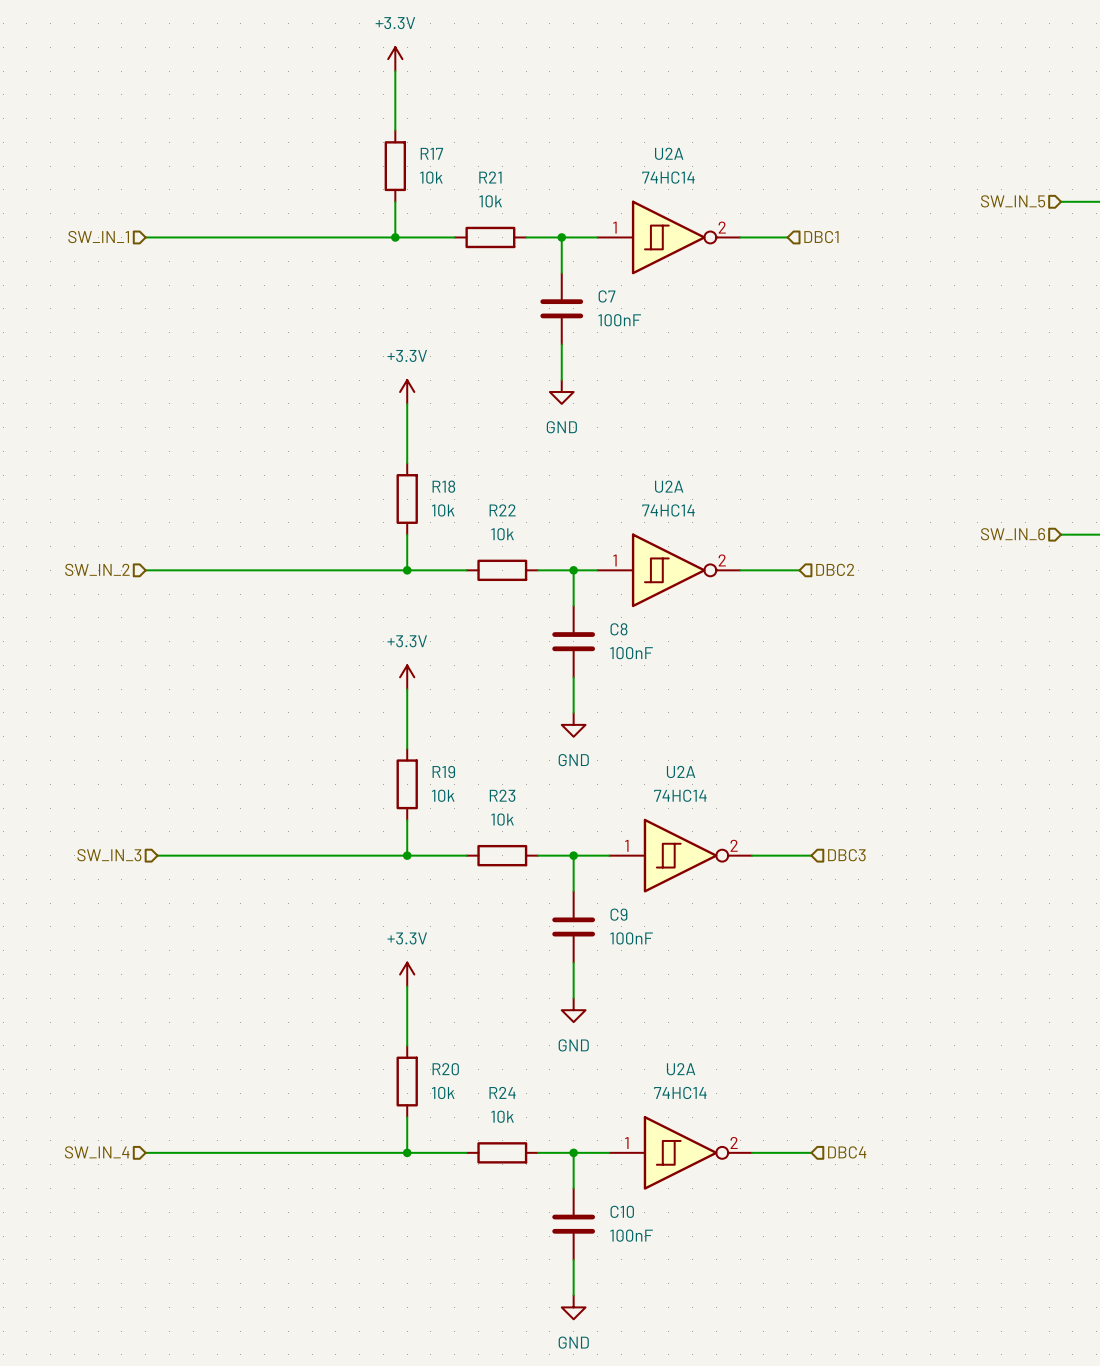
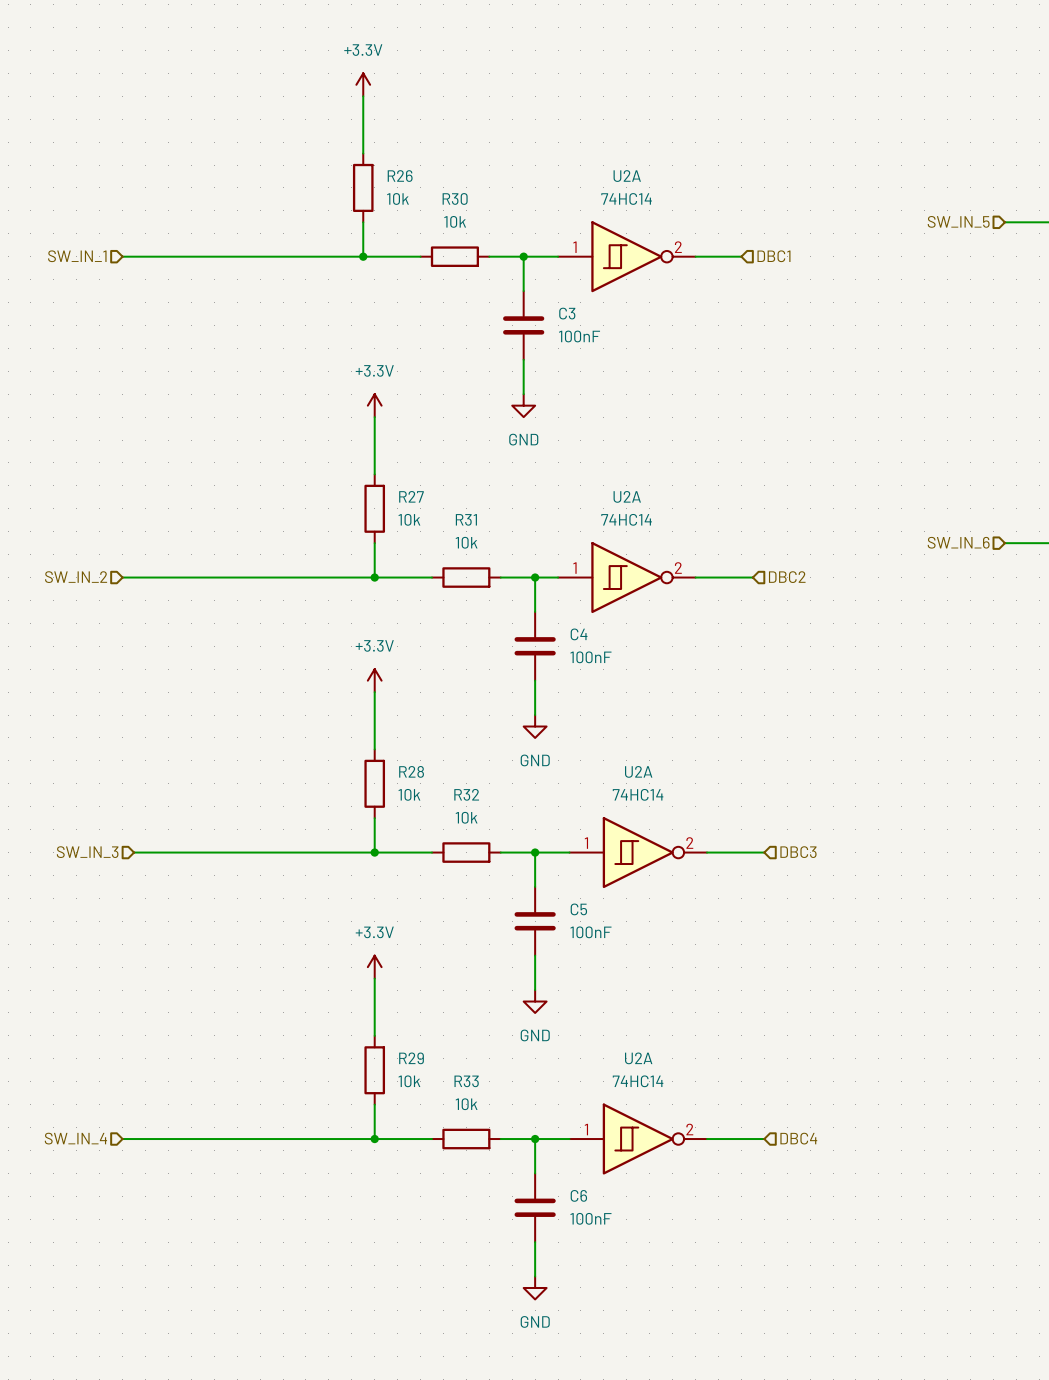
R17 name: R17 (431, 153) -> R26 (400, 176)
R21 name: R21 (490, 177) -> R30 (455, 198)
C7 name: C7 (607, 296) -> C3 (567, 313)
R18 name: R18 (443, 486) -> R27 (411, 496)
R22 name: R22 (502, 510) -> R31 (466, 519)
C8 name: C8 (618, 629) -> C4 (579, 634)
R19 name: R19 (443, 771) -> R28 (411, 771)
R23 name: R23 (502, 795) -> R32 (466, 794)
C9 name: C9 (618, 914) -> C5 (578, 909)
R20 name: R20 (445, 1069) -> R29 (411, 1058)
R24 name: R24 (502, 1092) -> R33 (466, 1081)
C10 name: C10 (622, 1211) -> C6 (578, 1195)

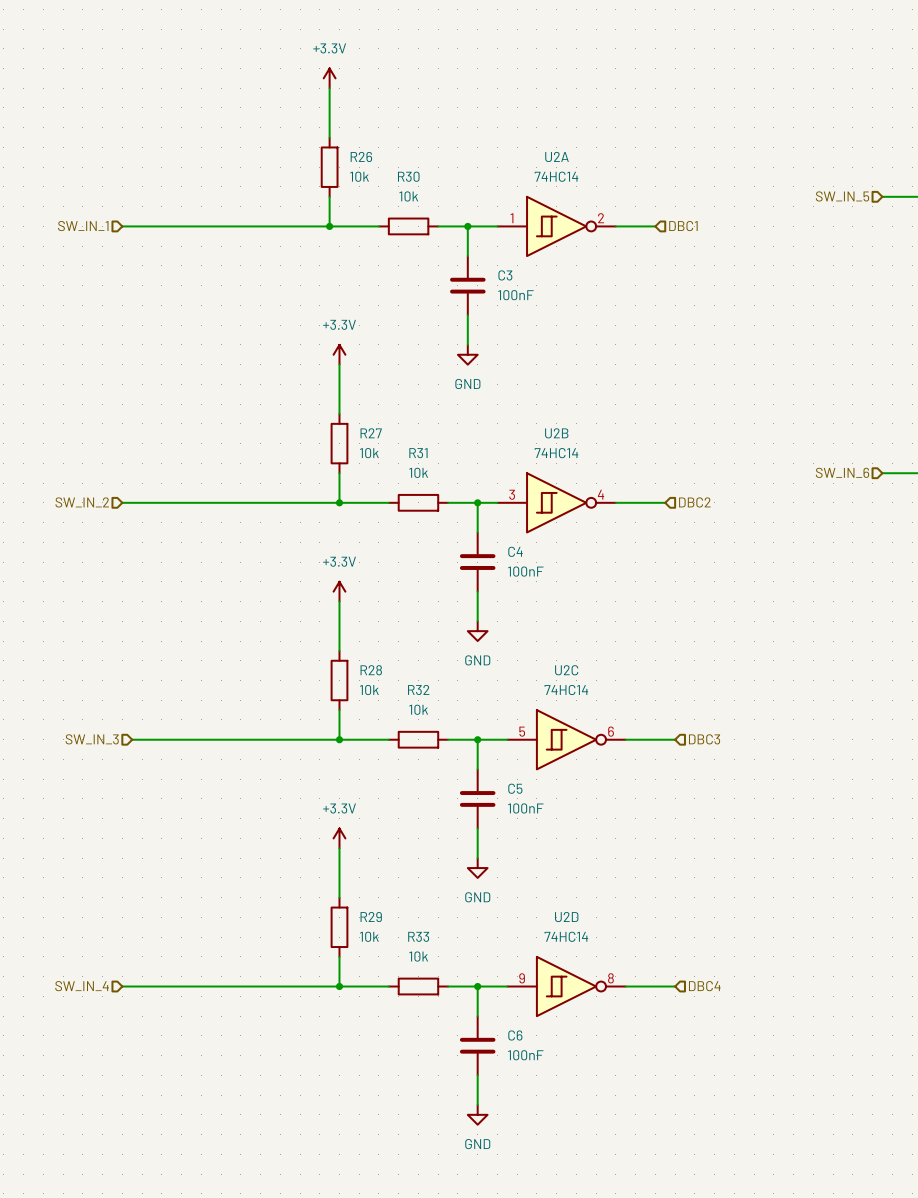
U2A name: U2A (627, 496) -> U2B (556, 433)
U2A pin number: 1 (574, 568) -> 3 (512, 494)
U2A pin number: 2 (678, 568) -> 4 (600, 494)
U2A name: U2A (638, 771) -> U2C (566, 670)
U2A pin number: 1 (586, 843) -> 5 (522, 731)
U2A pin number: 2 (689, 843) -> 6 (611, 731)
U2A name: U2A (638, 1058) -> U2D (566, 917)
U2A pin number: 1 (586, 1129) -> 9 (522, 978)
U2A pin number: 2 (689, 1129) -> 8 (610, 978)

